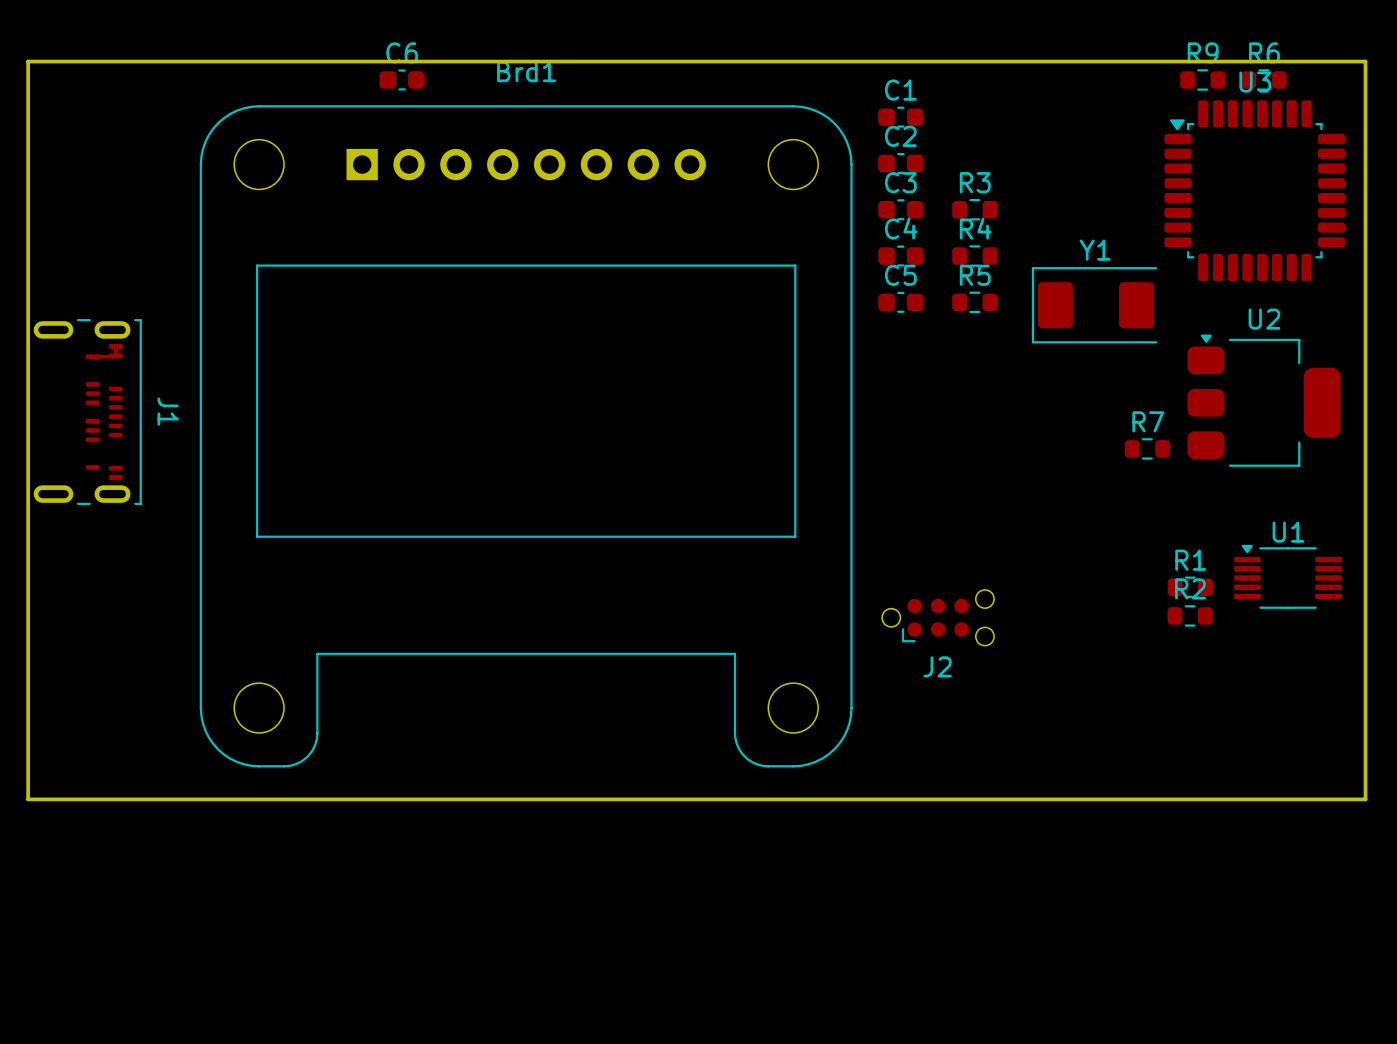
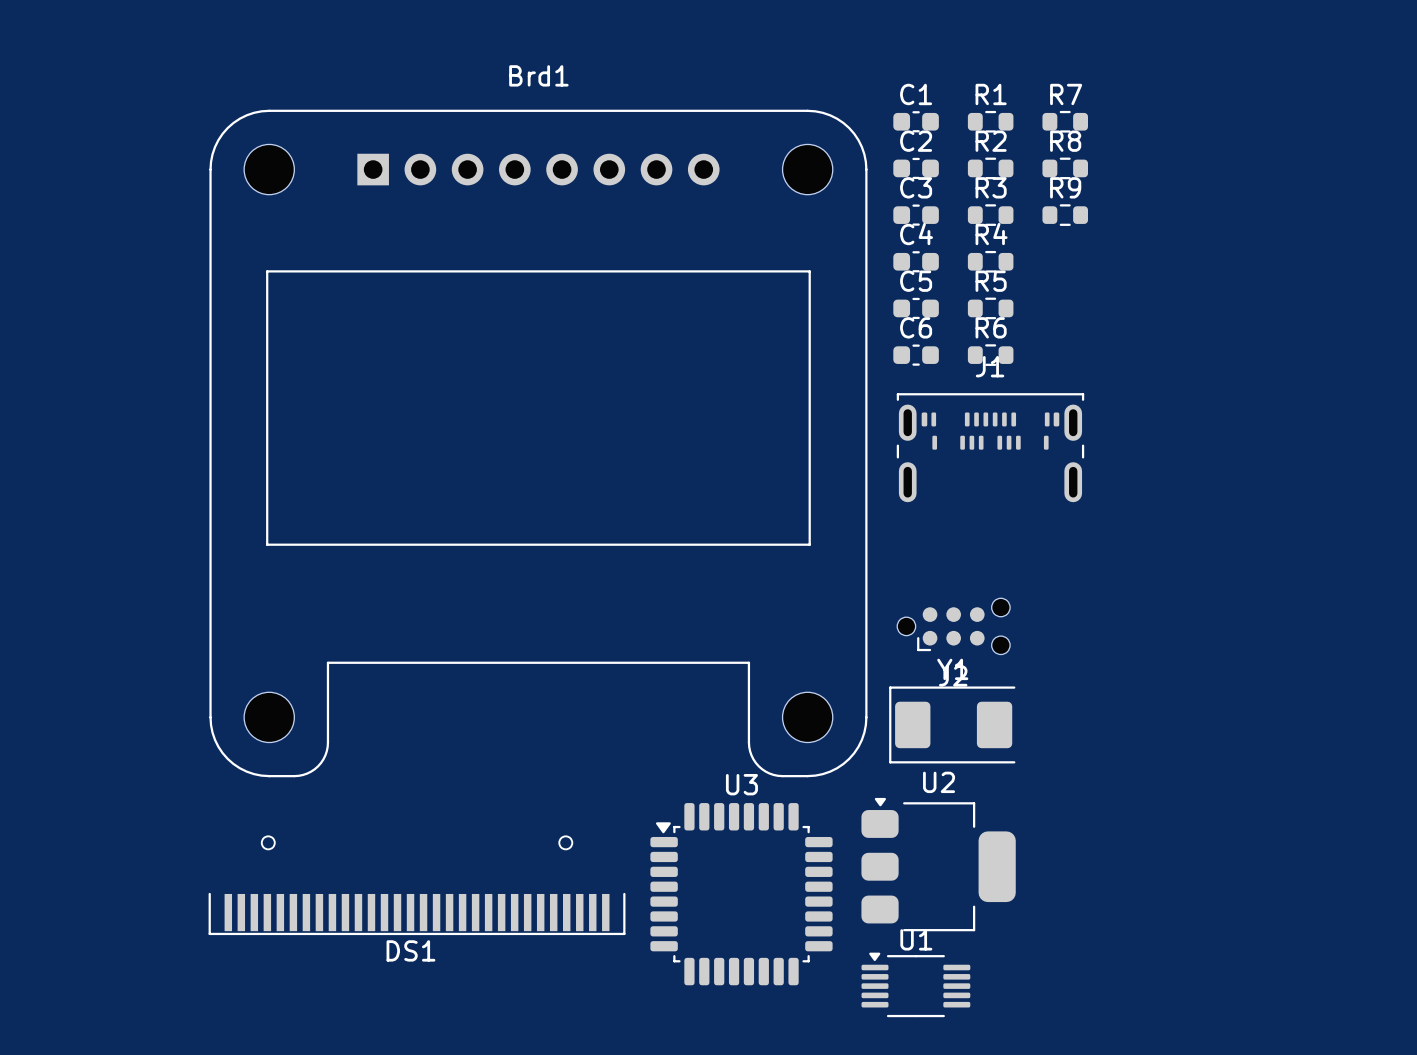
board edge: (28, 61) (1365, 61) (1365, 799) (28, 799) (28, 61) -> none
C6 position: (402, 79) -> (916, 355)
R9 position: (1202, 79) -> (1065, 215)
R6 position: (1264, 79) -> (990, 355)
R8: none -> (1065, 168)
U3 position: (1254, 190) -> (741, 894)
Y1 position: (1094, 305) -> (952, 724)
track: (115, 346) (114, 356) (92, 356) -> none
U2 position: (1264, 400) -> (938, 864)
J1 rotation: 0° (87, 412) -> 90° counterclockwise (990, 447)
J1 position: (87, 412) -> (990, 447)
R7 position: (1147, 448) -> (1065, 121)
U1 position: (1288, 576) -> (915, 984)
R1 position: (1190, 587) -> (990, 121)
R2 position: (1190, 615) -> (990, 168)
DS1: none -> (417, 885)

